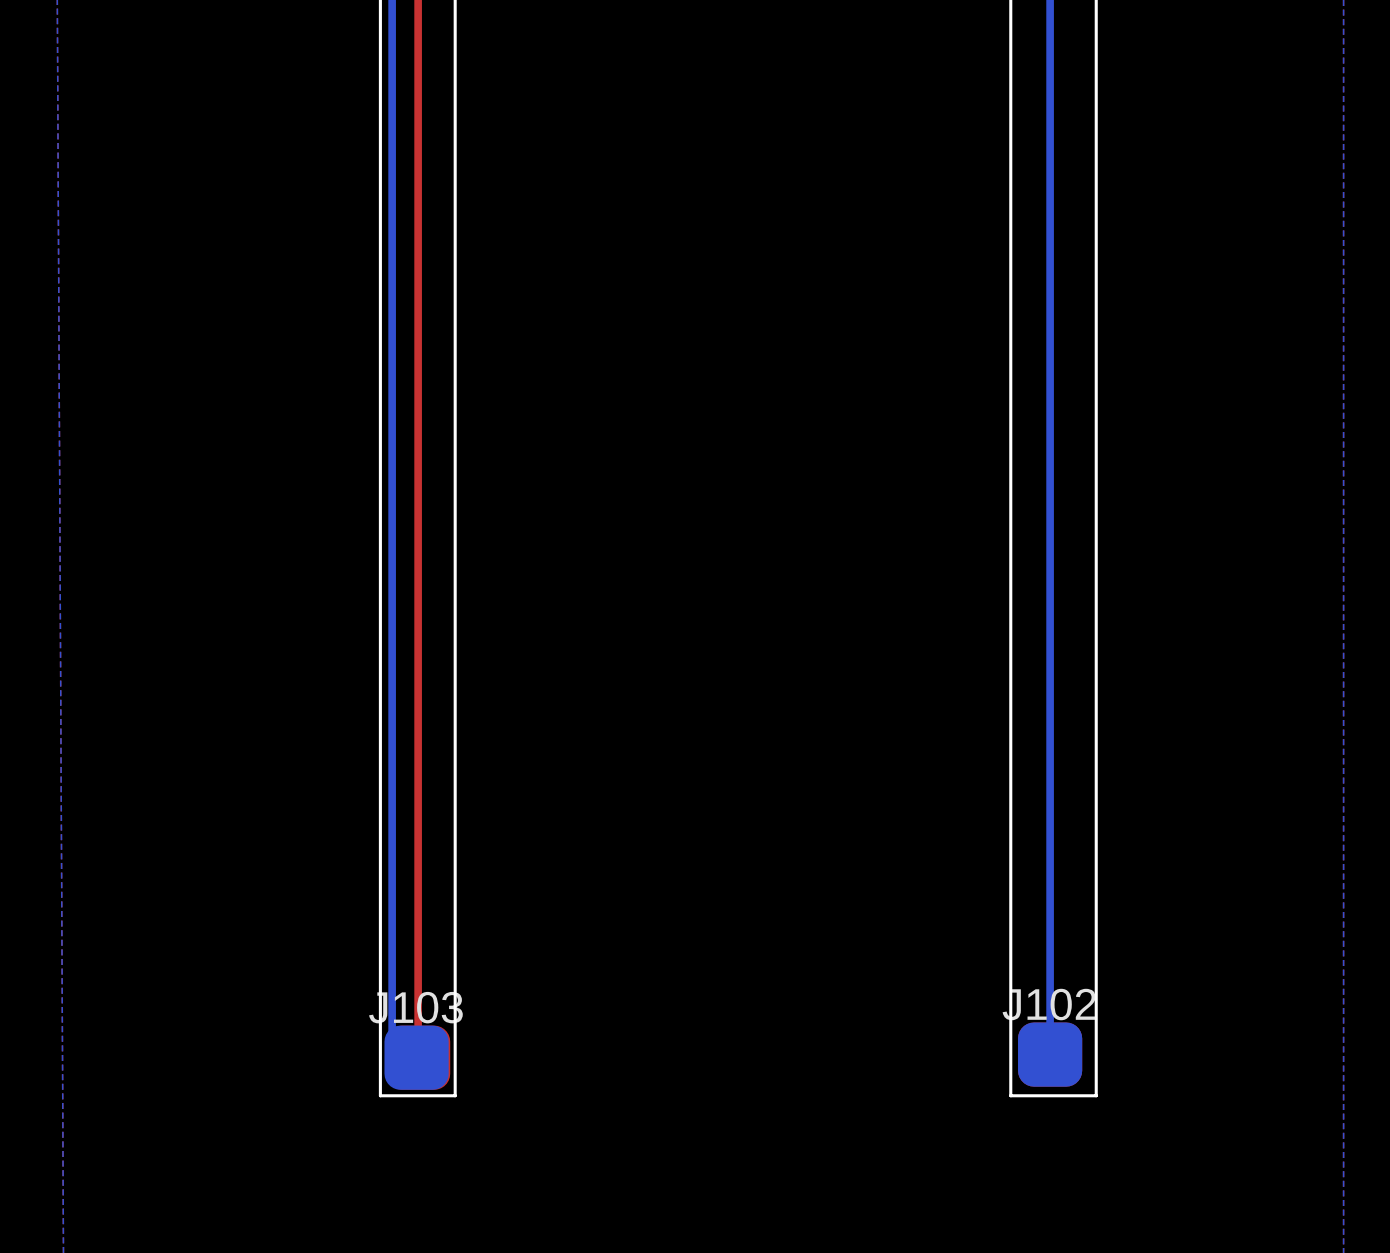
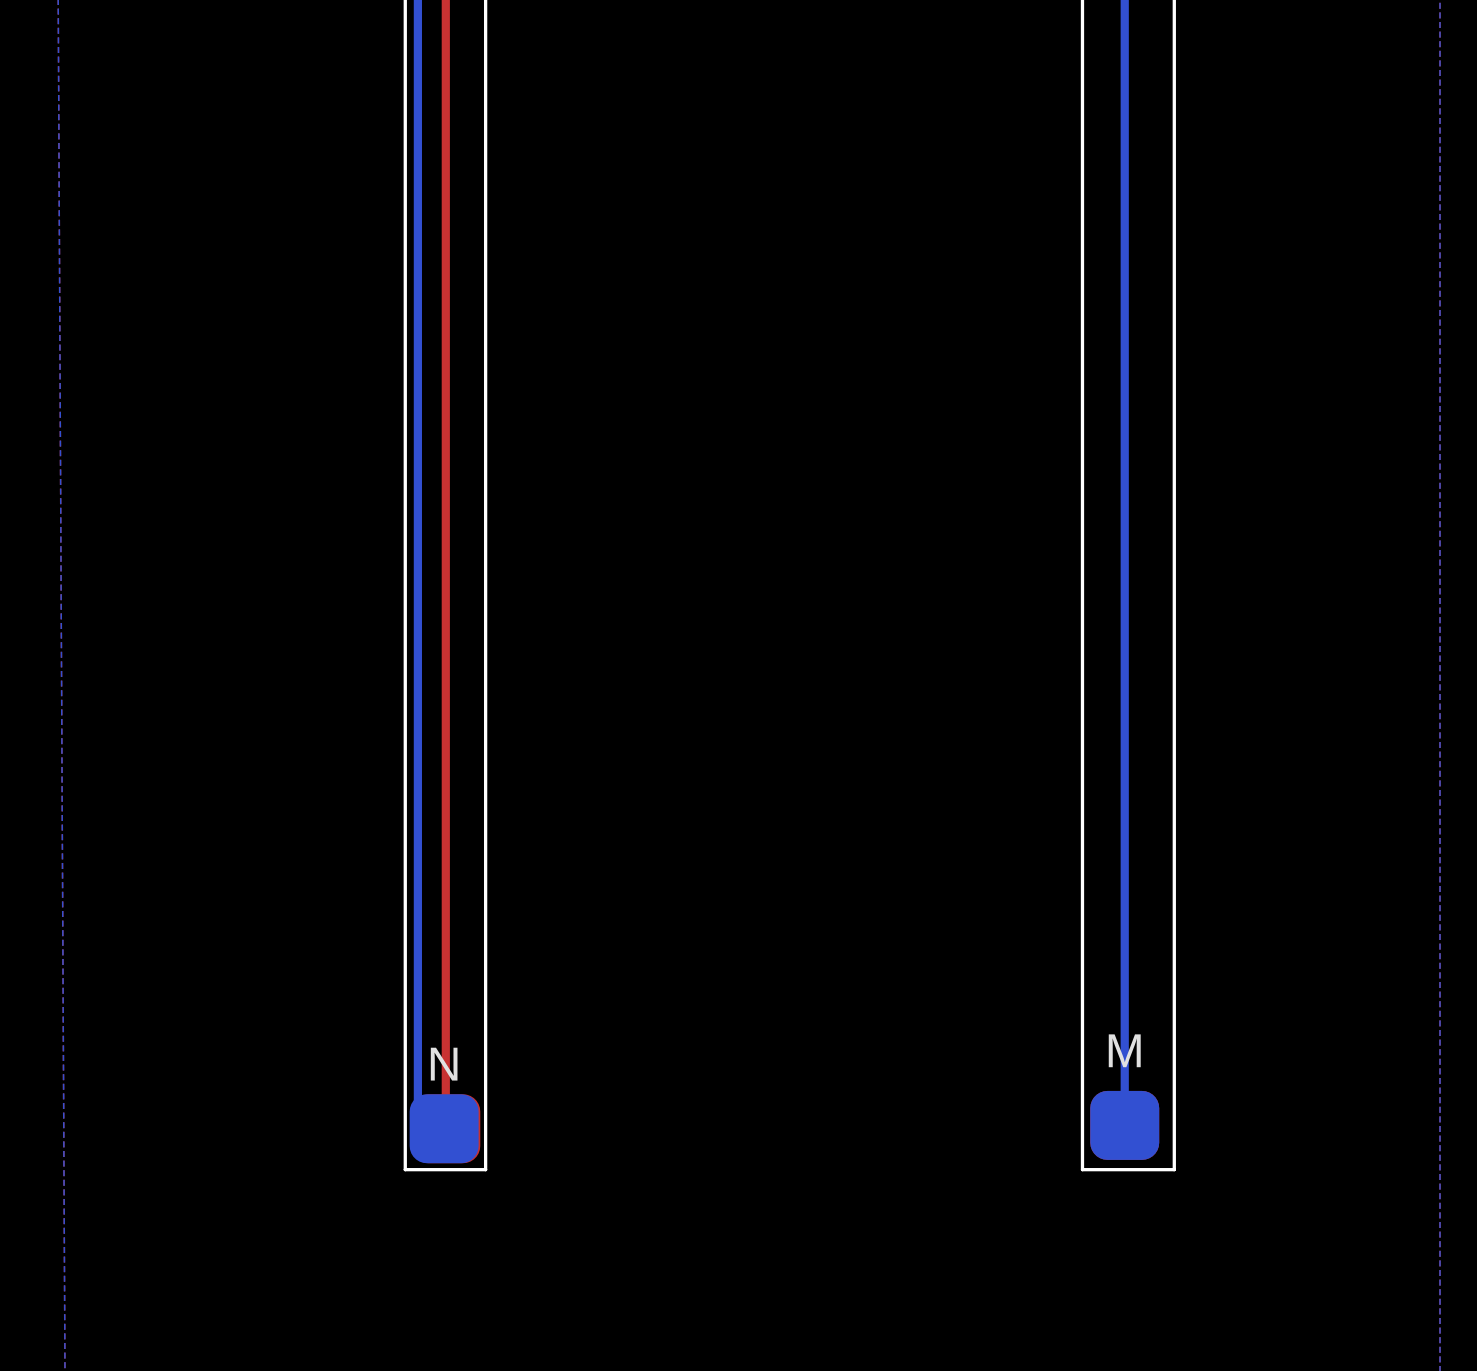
J102 value: none -> M (1124, 1050)
J103 value: none -> N (444, 1064)
J102 name: J102 (1049, 1004) -> none
J103 name: J103 (415, 1007) -> none

